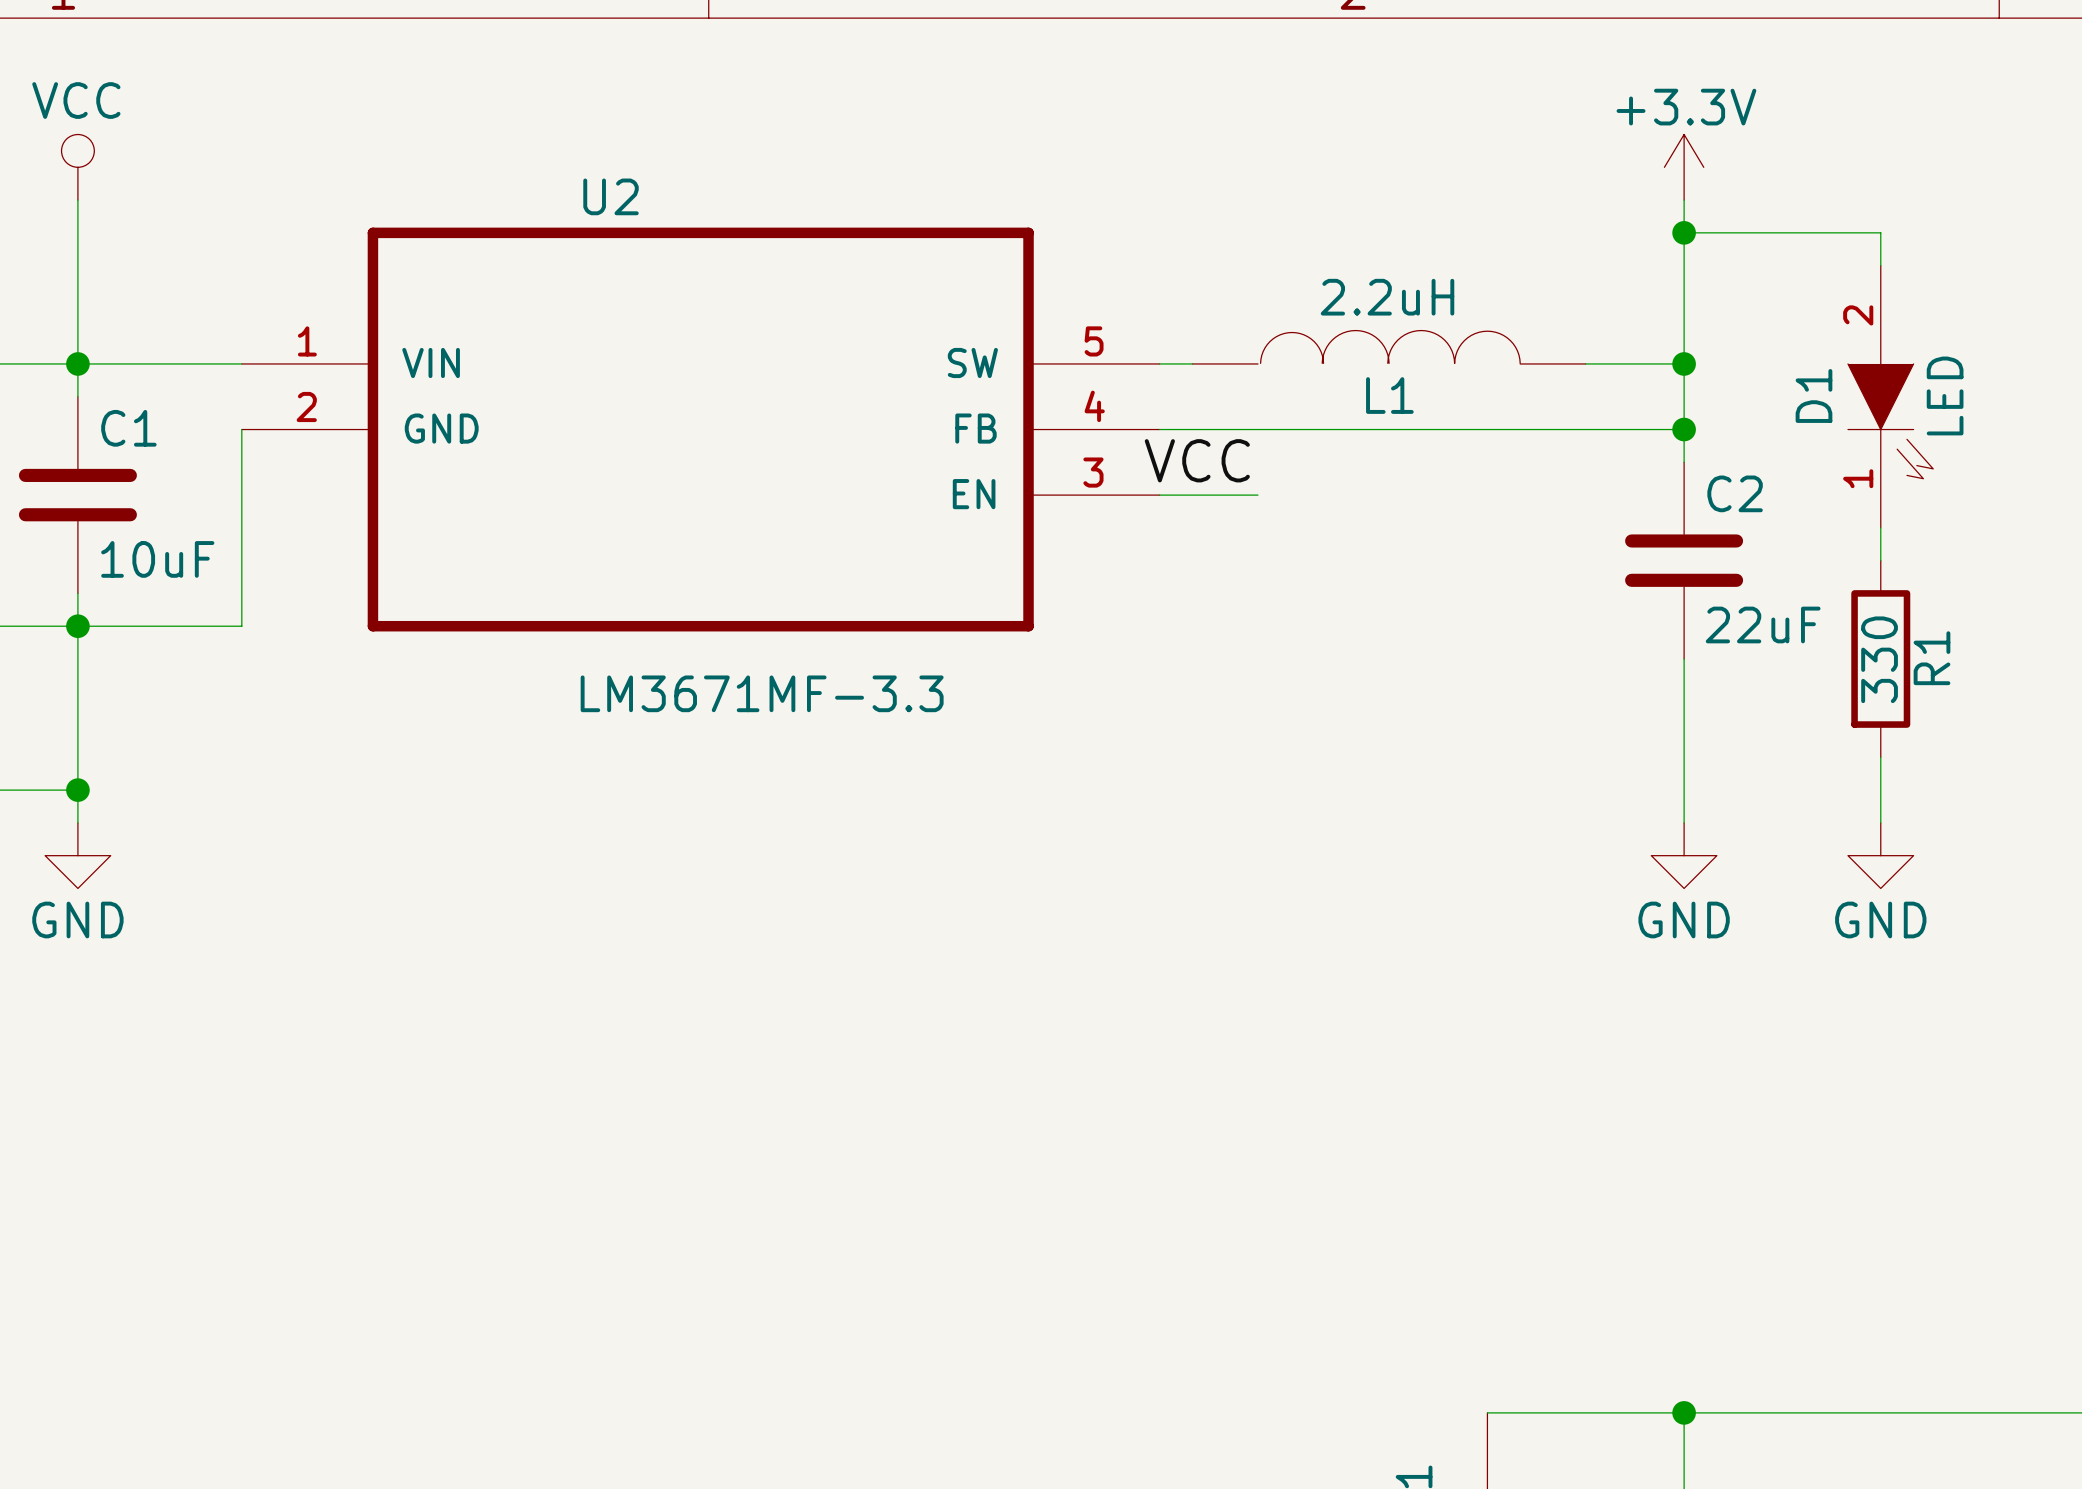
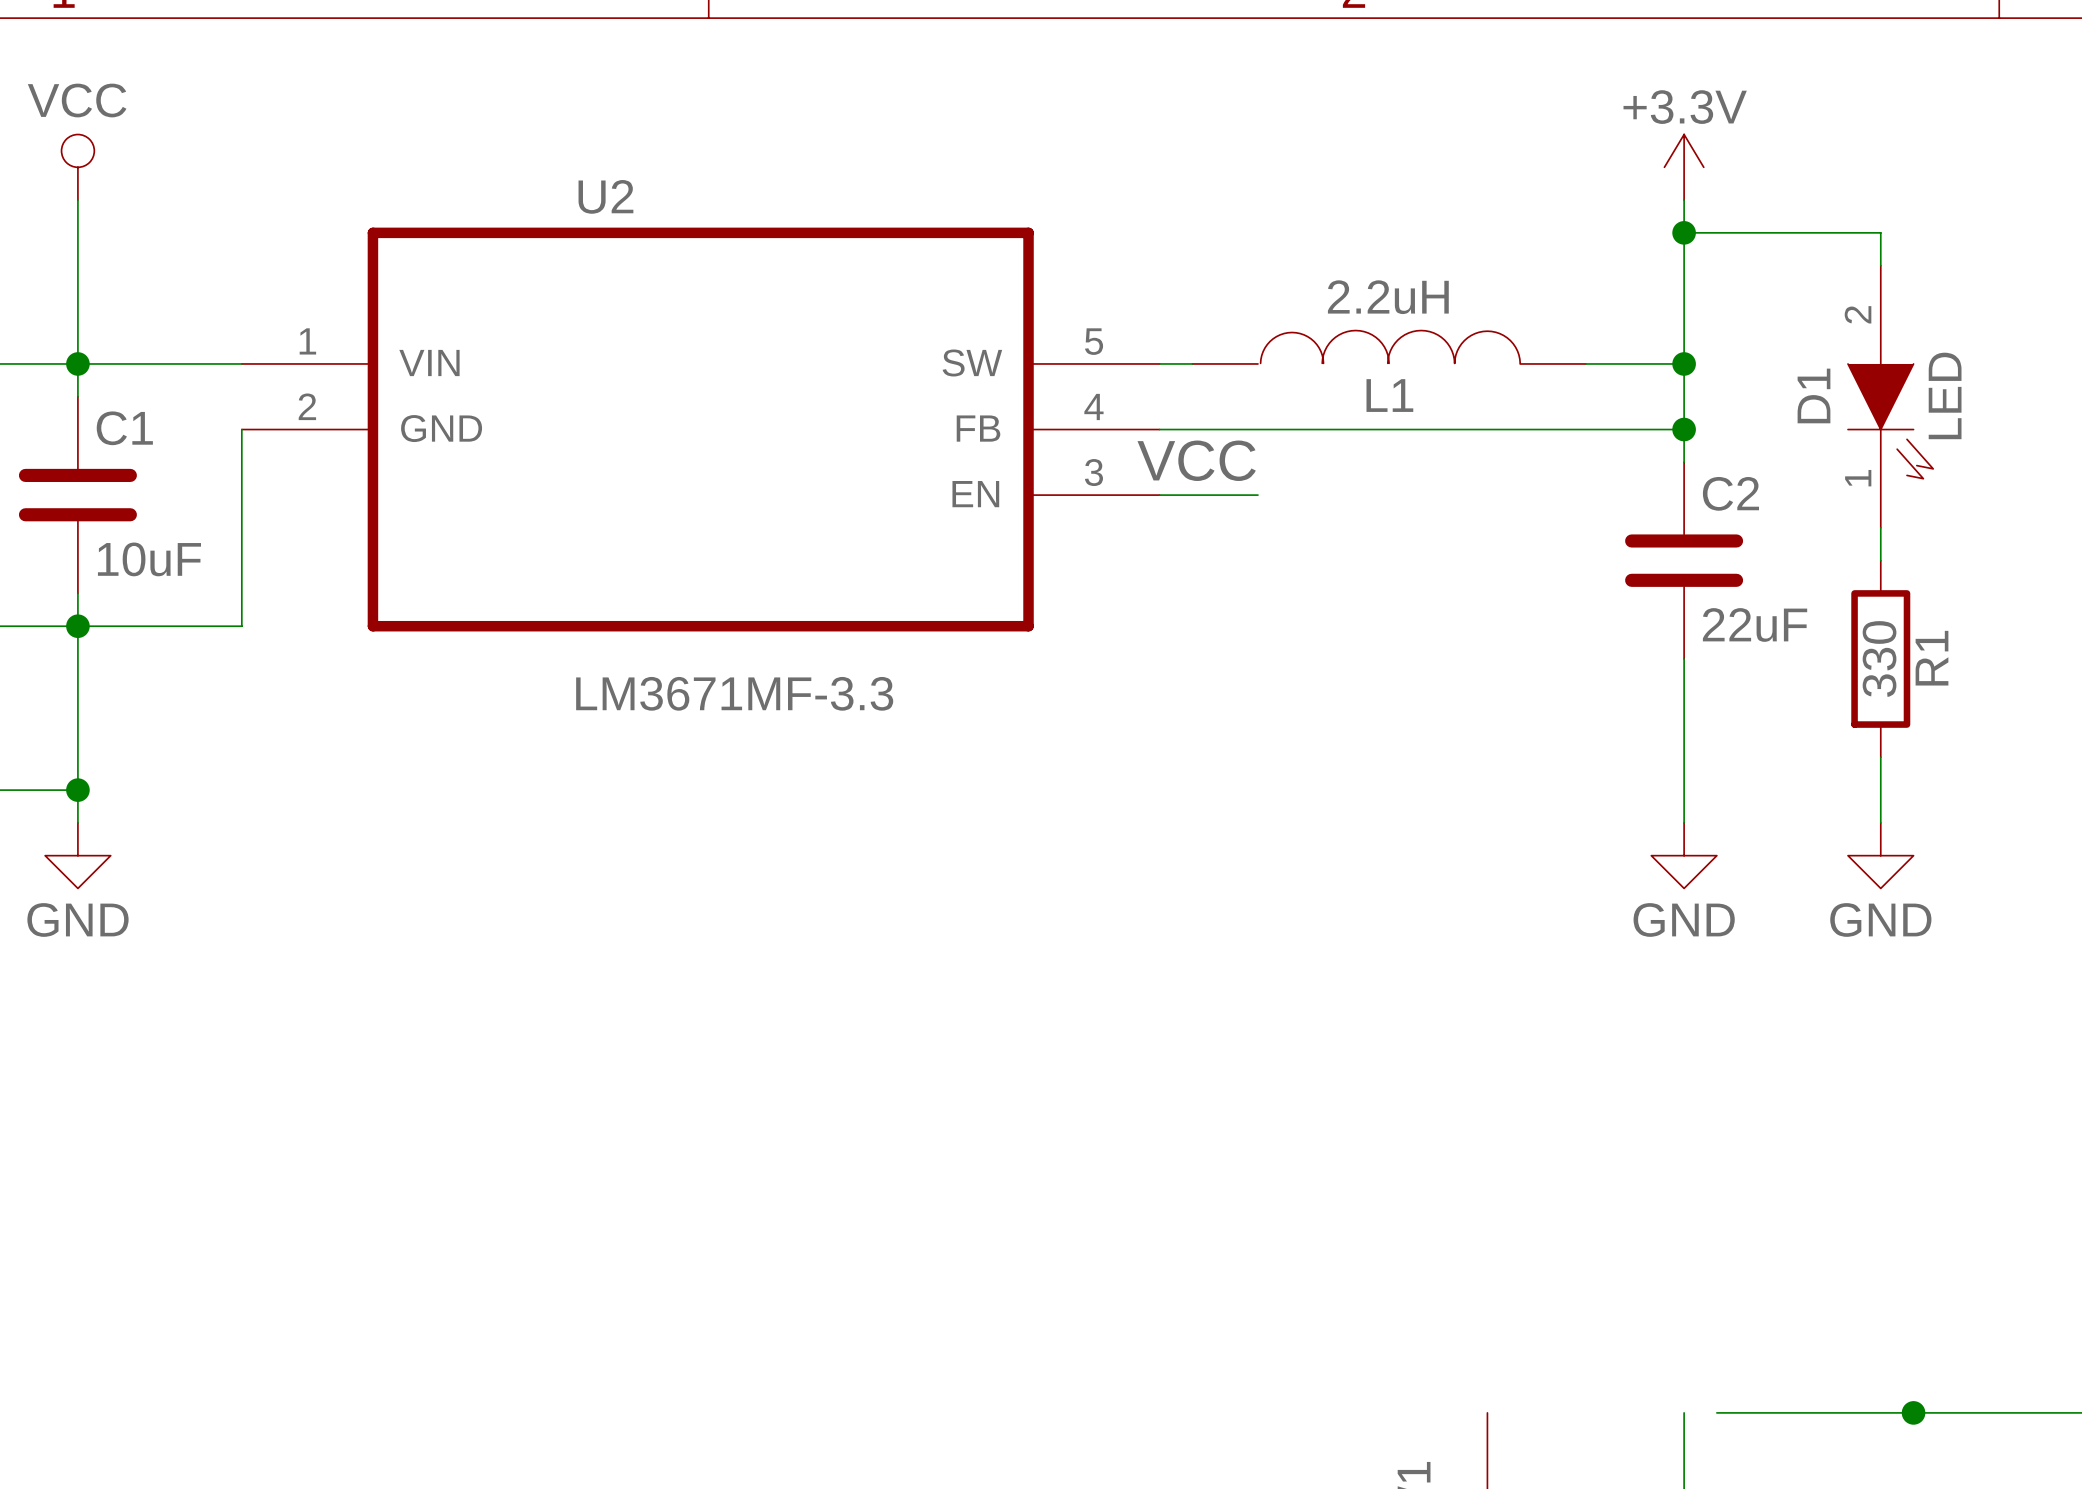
wire: (1487, 1412) (1716, 1412) -> none
junction: (1684, 1412) -> none
junction: none -> (1913, 1412)

